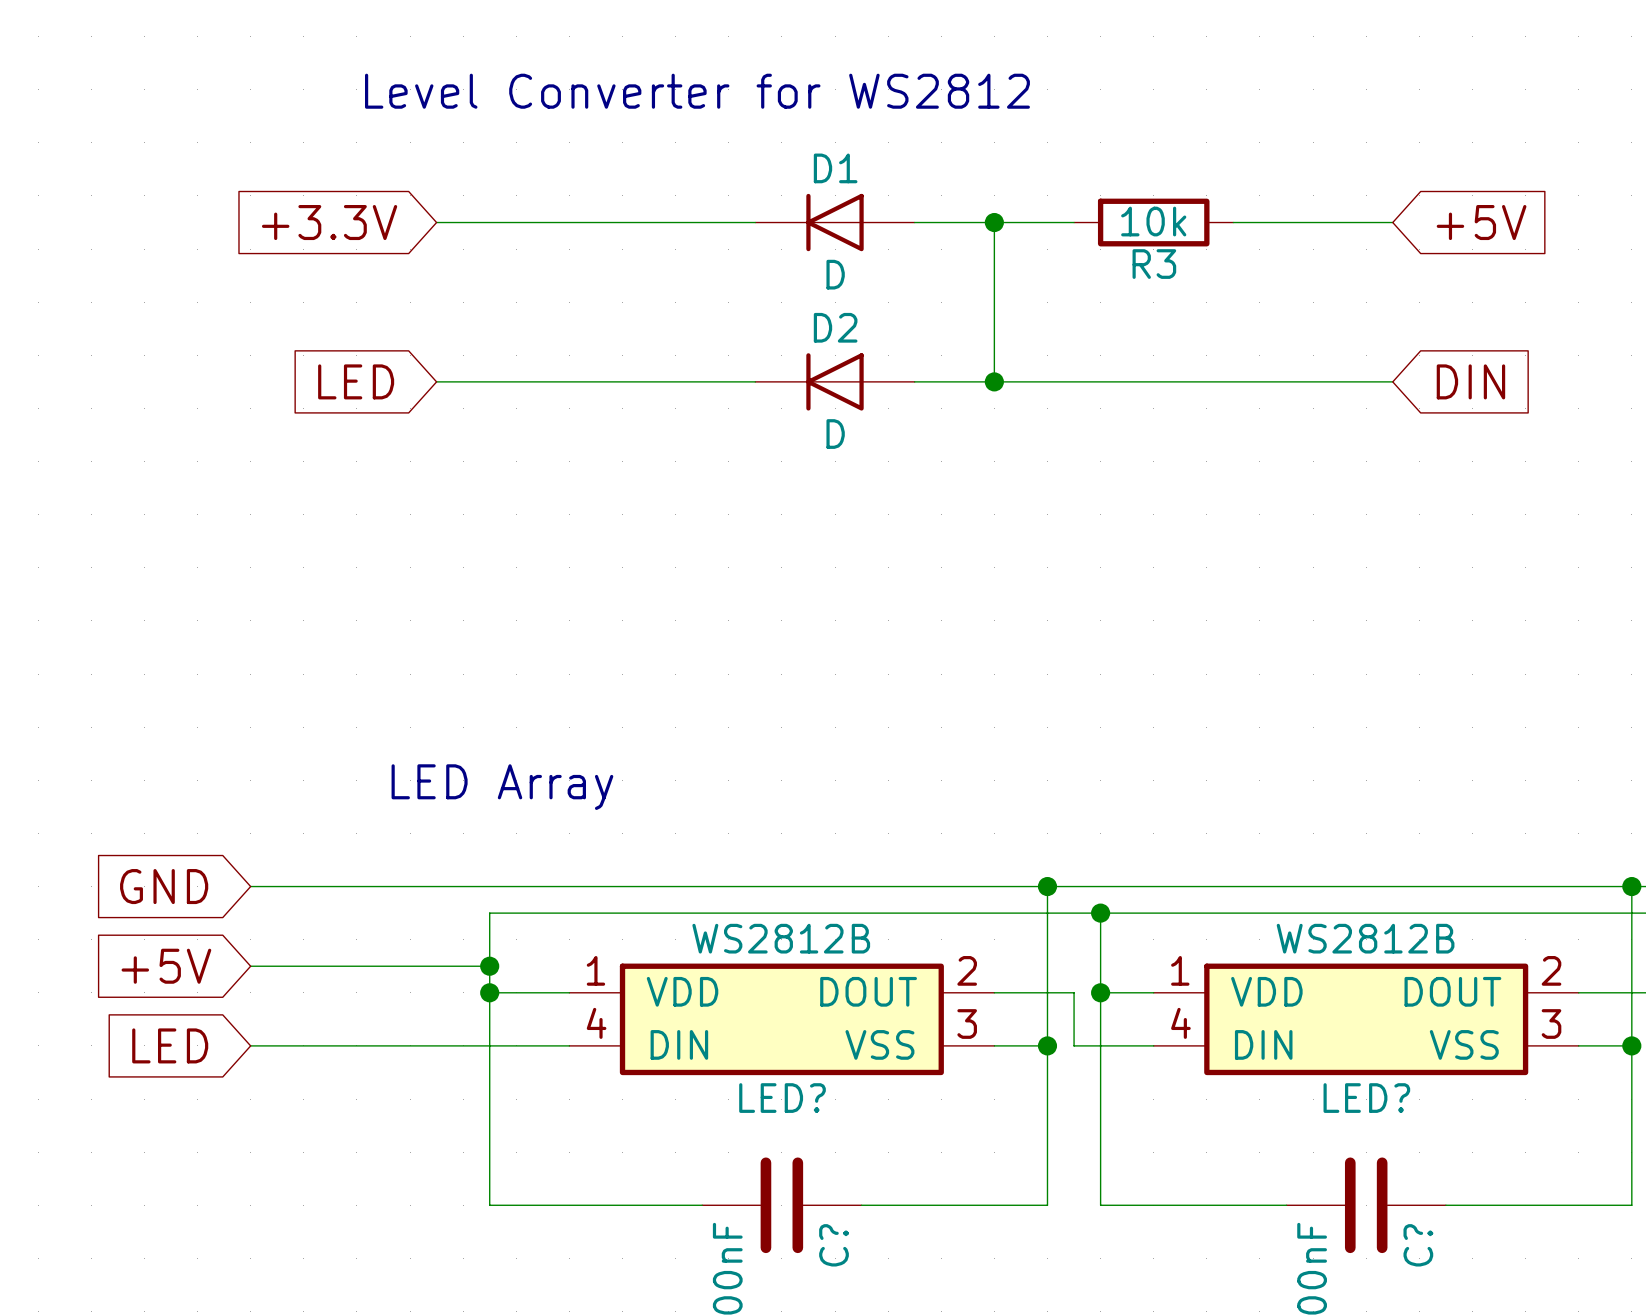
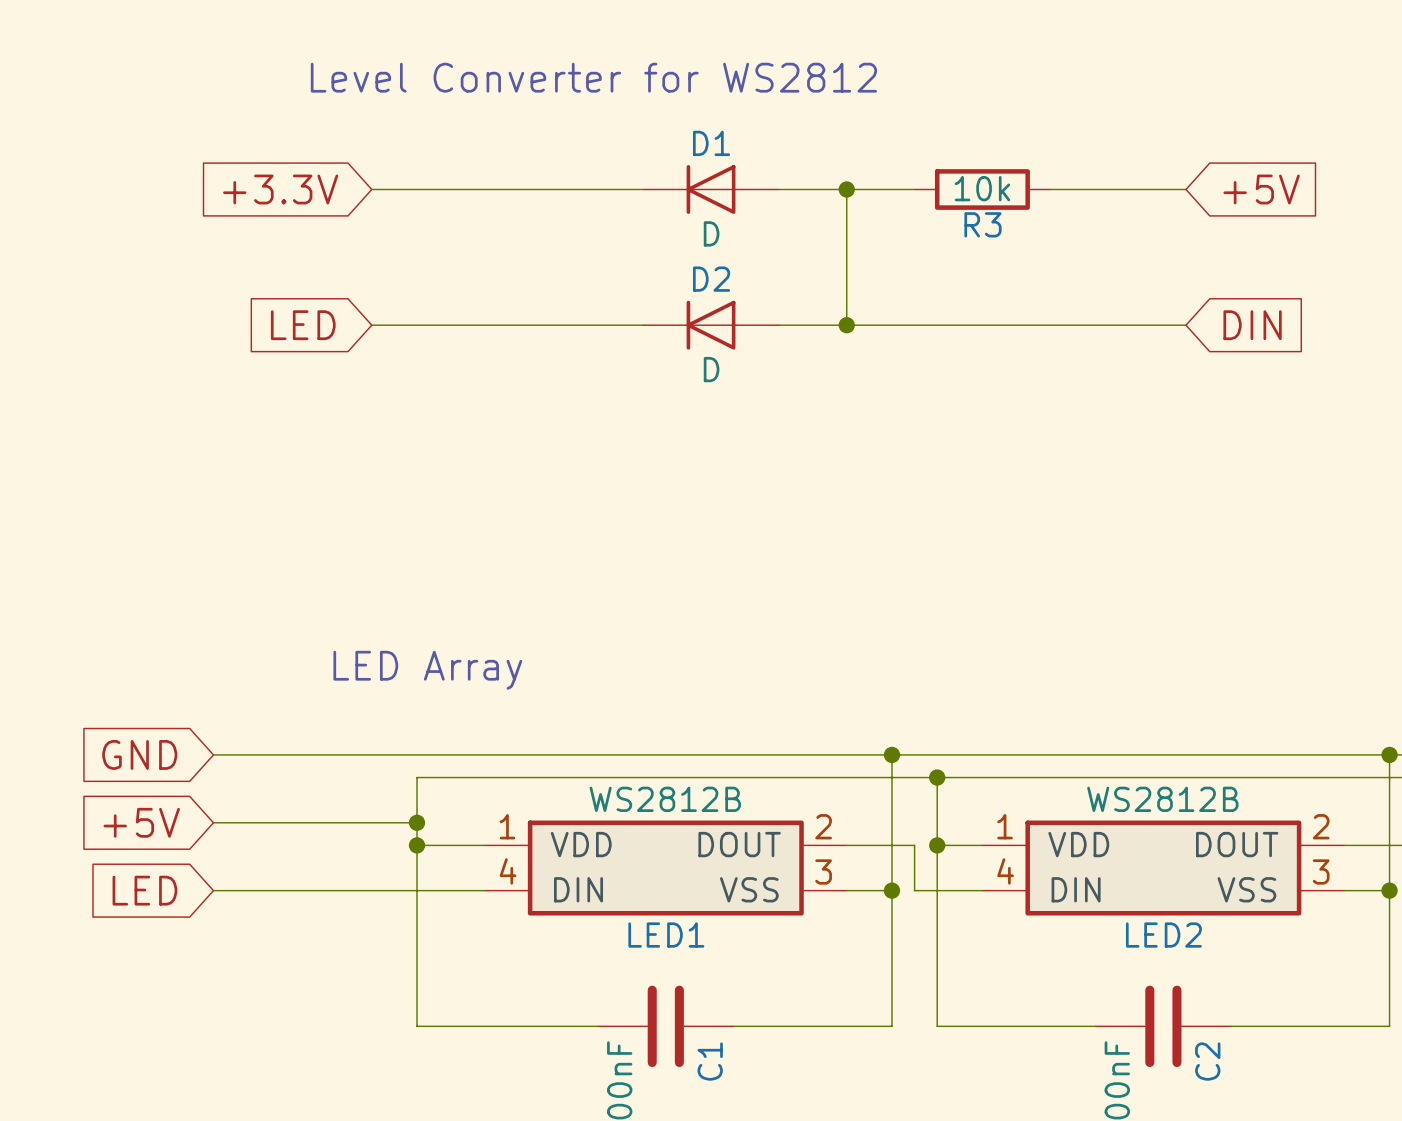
LED? name: LED? (782, 1098) -> LED1 (666, 935)
LED? name: LED? (1366, 1098) -> LED2 (1163, 935)
C? name: C? (834, 1245) -> C1 (710, 1061)
C? name: C? (1418, 1245) -> C2 (1207, 1061)

